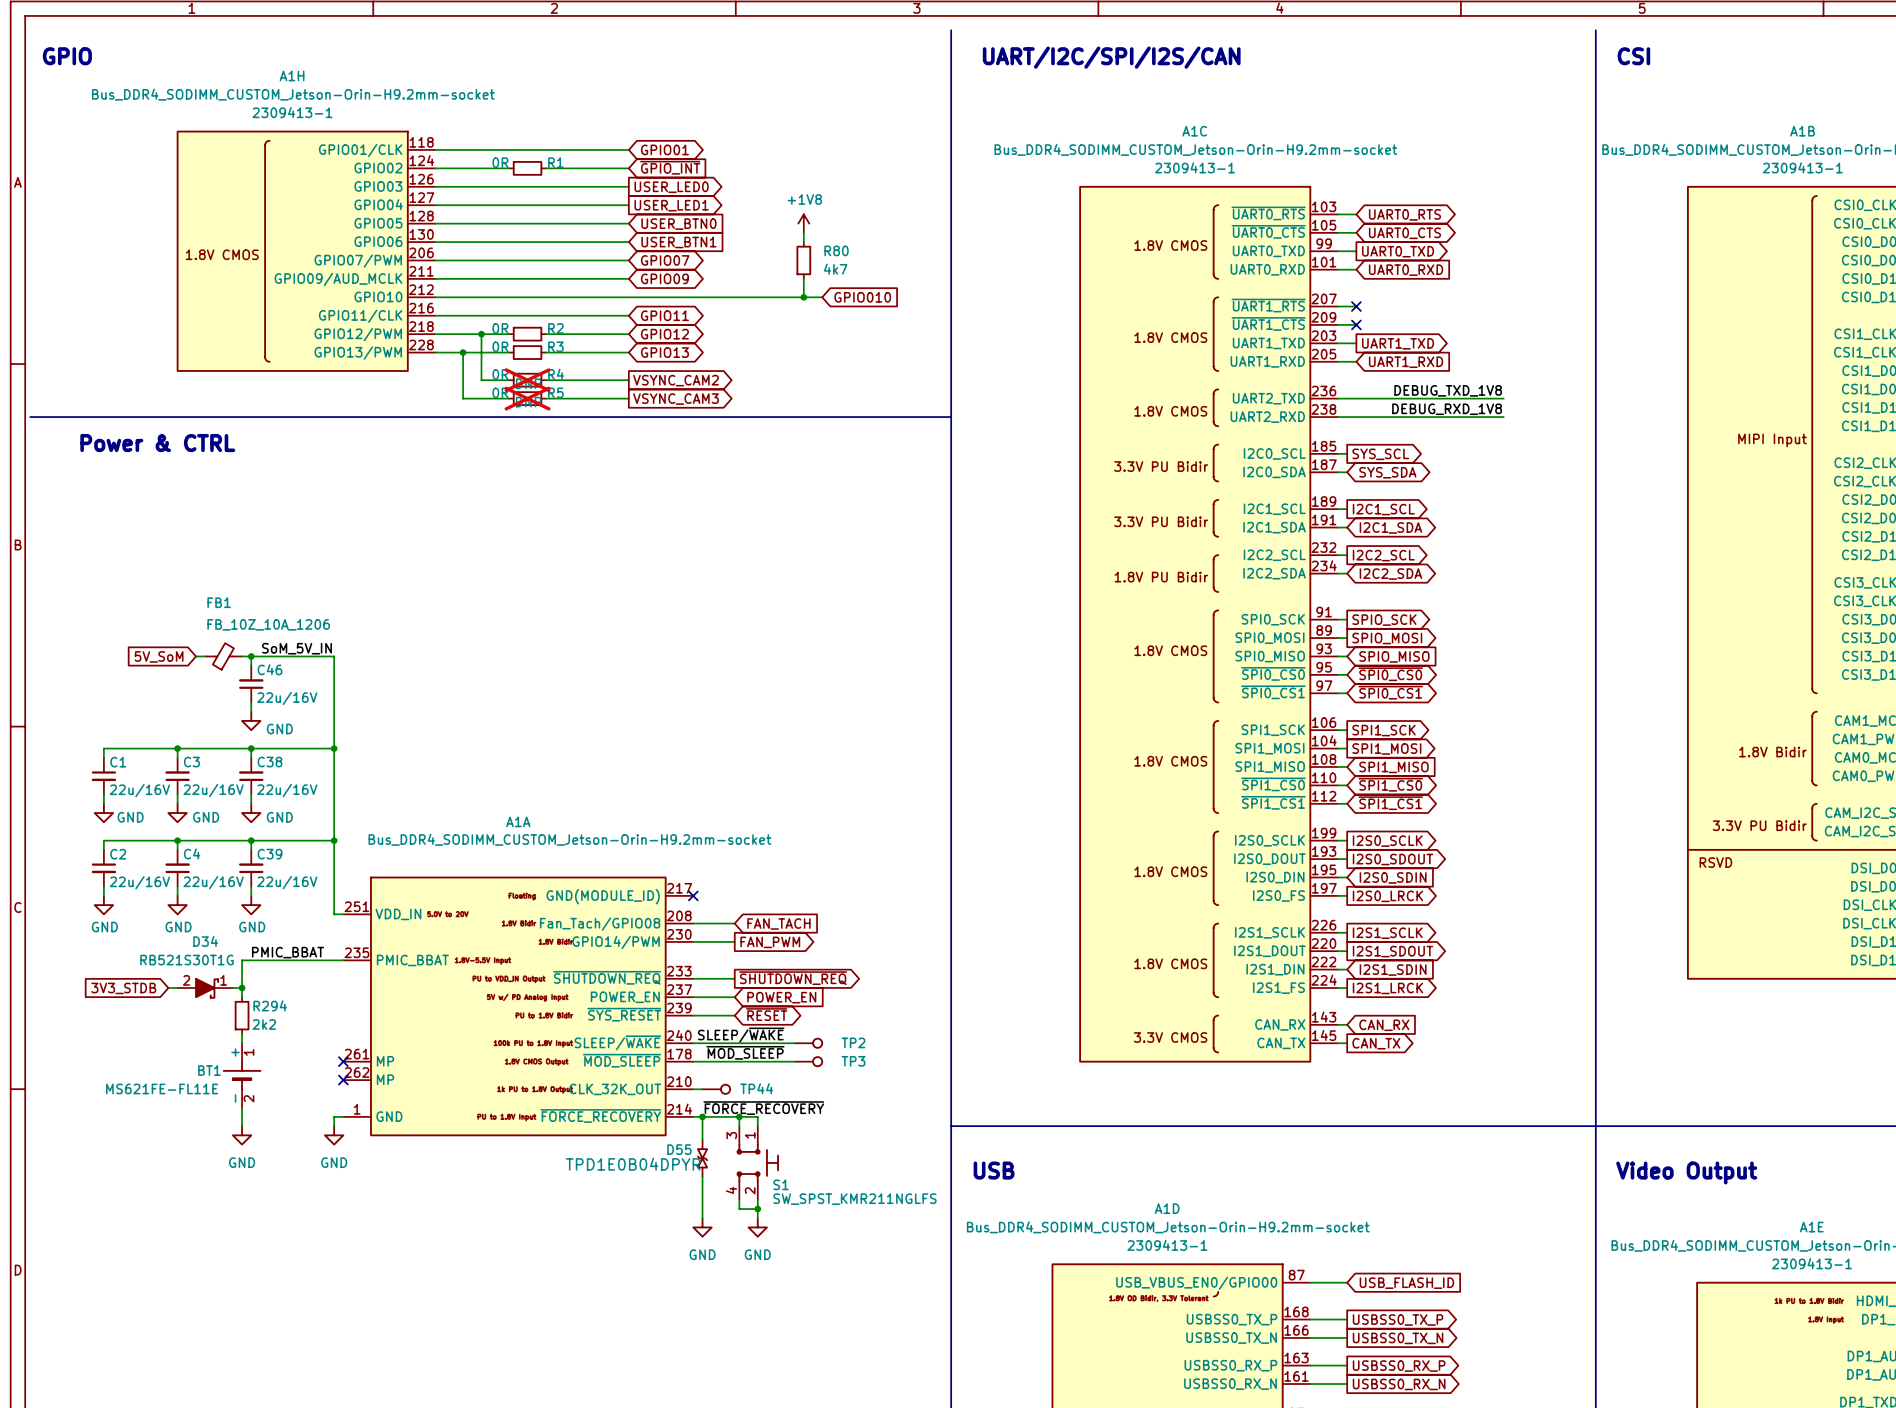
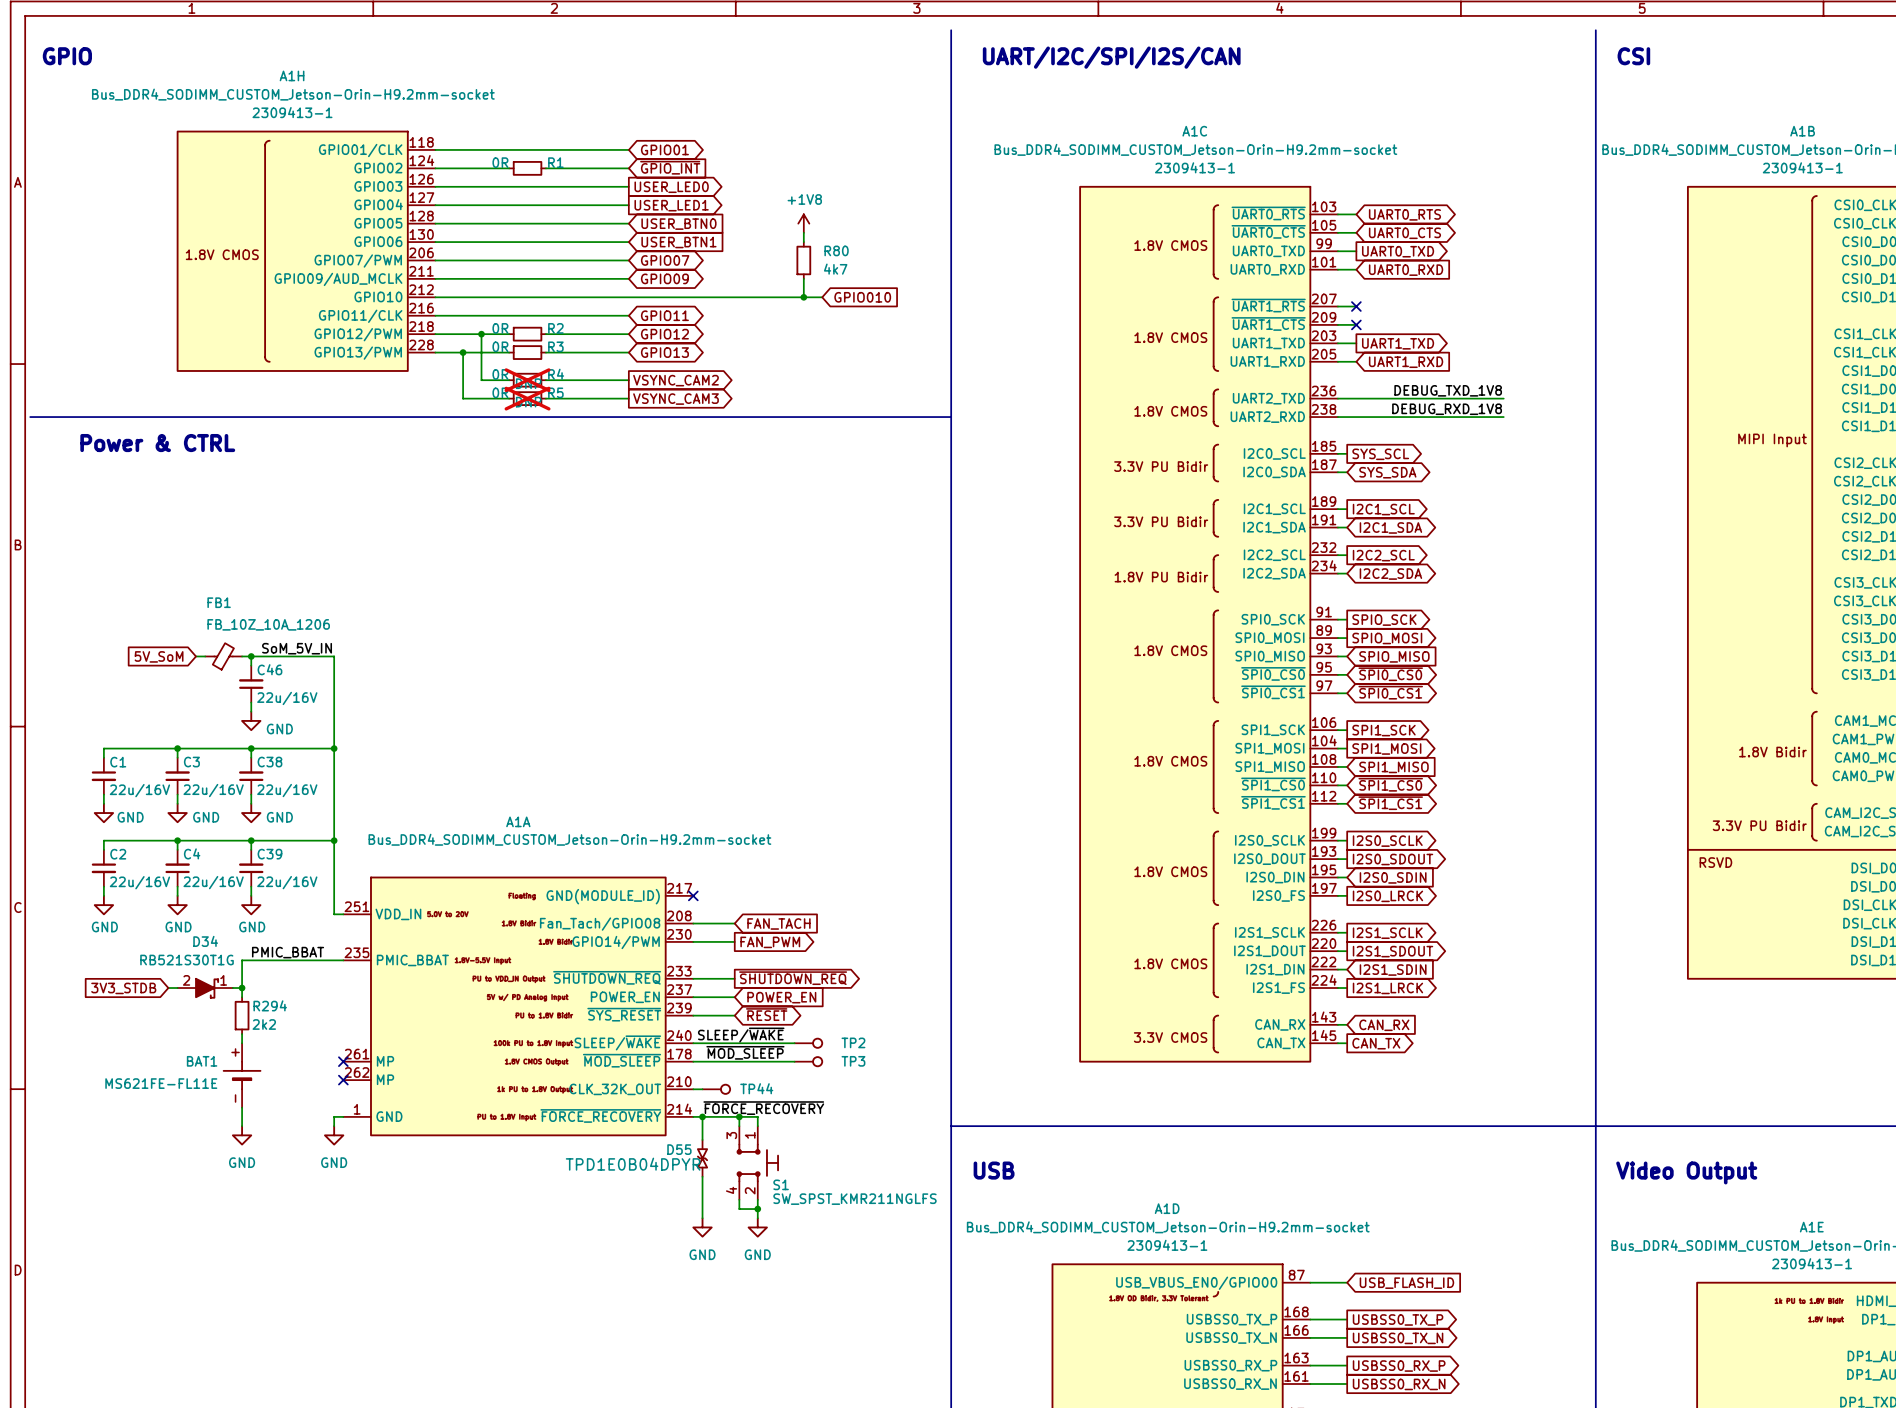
BT1 pin name: + (235, 1052) -> none
BT1 pin number: 1 (248, 1052) -> + (235, 1052)
BT1 name: BT1 (209, 1070) -> BAT1 (202, 1061)
BT1 text position: MS621FE-FL11E (162, 1088) -> MS621FE-FL11E (161, 1083)
BT1 pin name: - (235, 1098) -> none
BT1 pin number: 2 (248, 1098) -> - (235, 1098)

